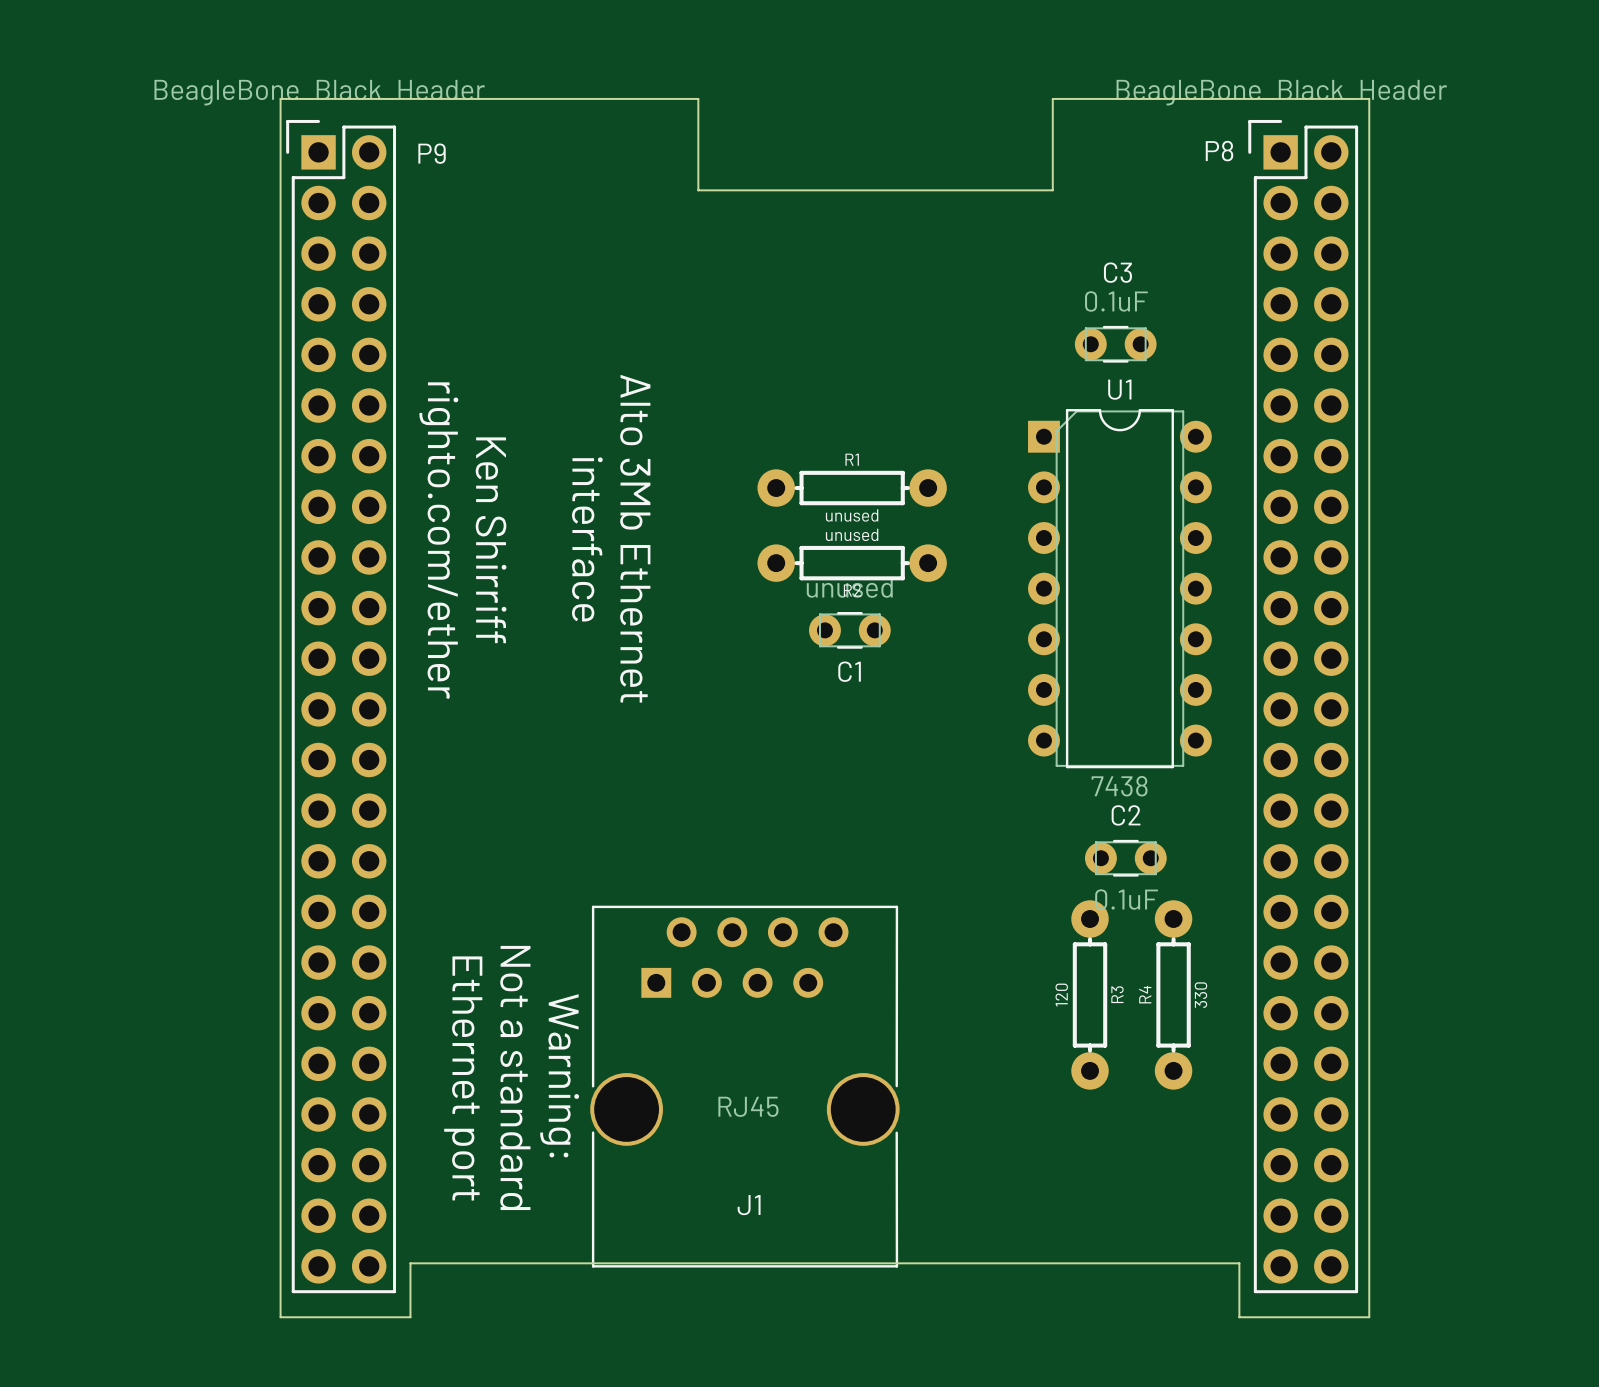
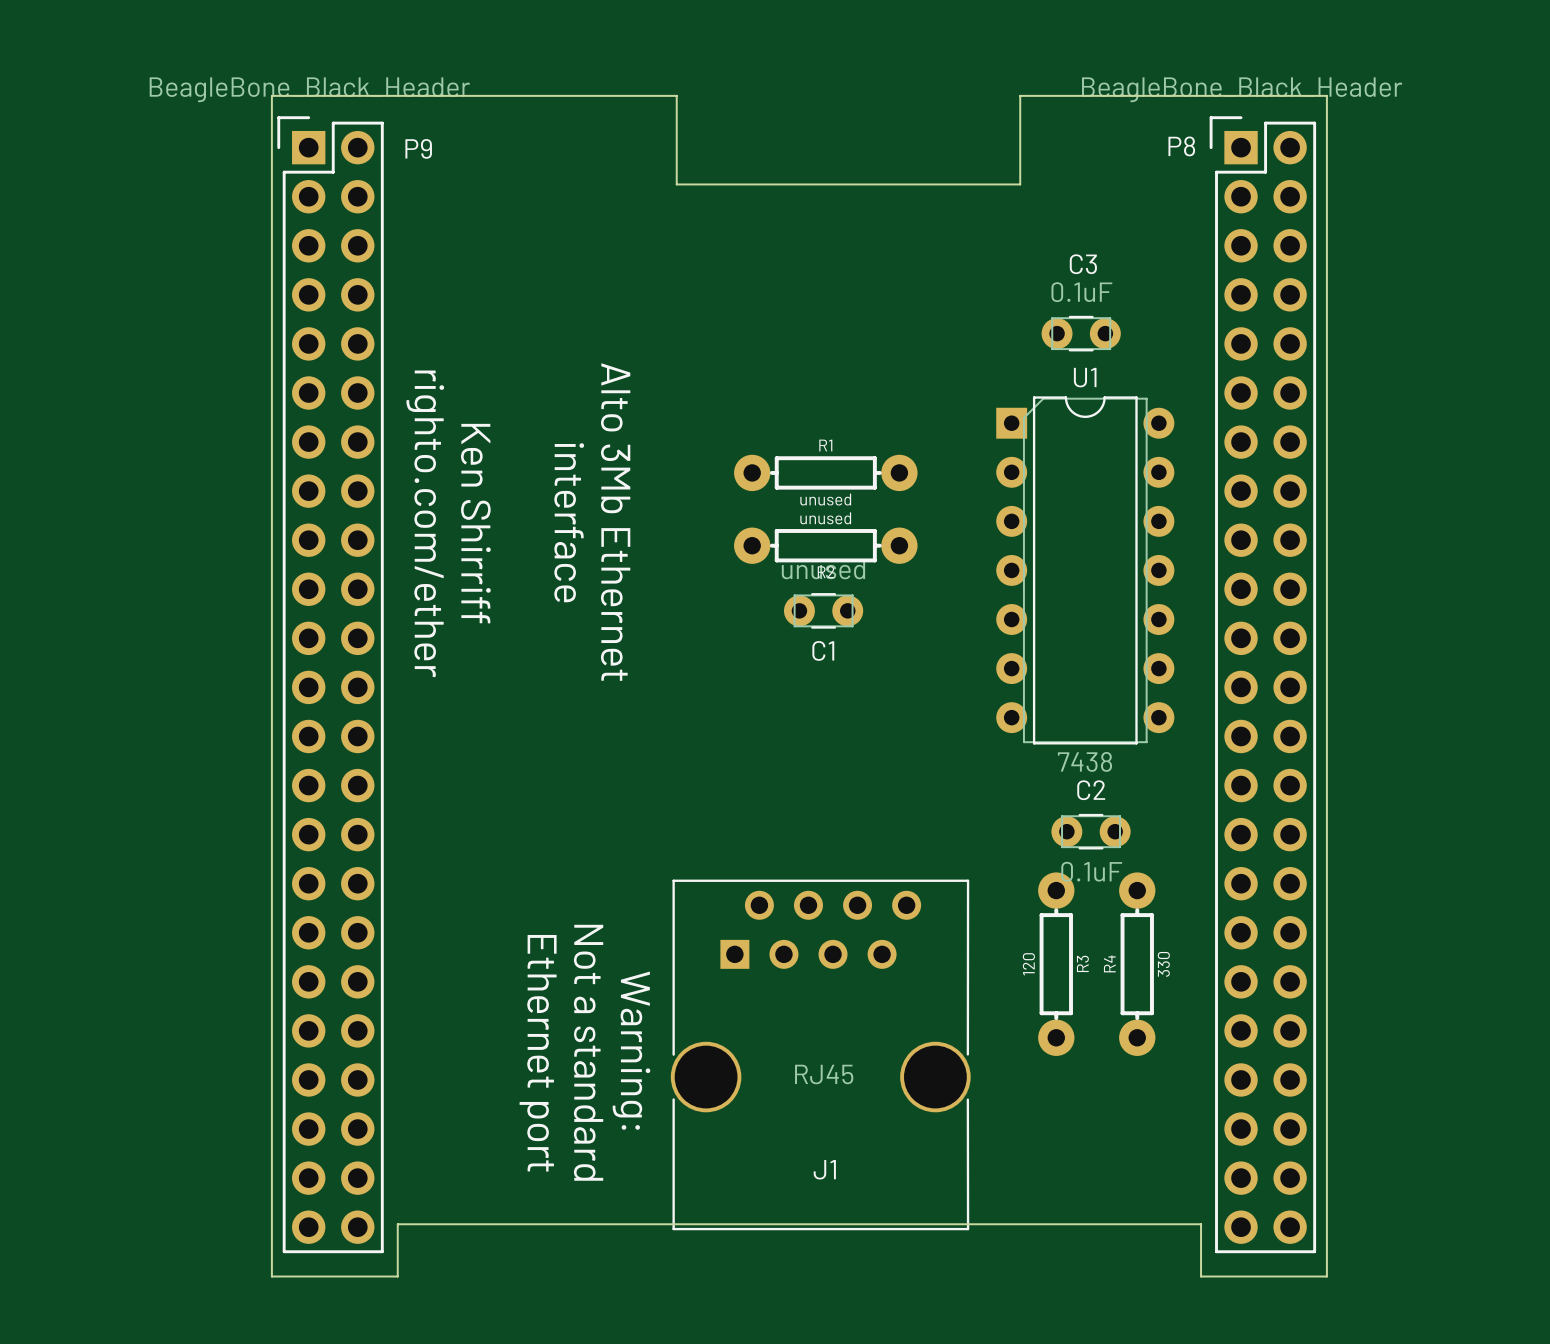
text: Warning: (559, 1075) -> Ethernet port (538, 1053)
text position: Not a standard (515, 1077) -> Not a standard (588, 1052)
text: Ethernet port (463, 1078) -> none
text: none -> Warning: (631, 1050)
J1 position: (744, 1086) -> (820, 1054)

